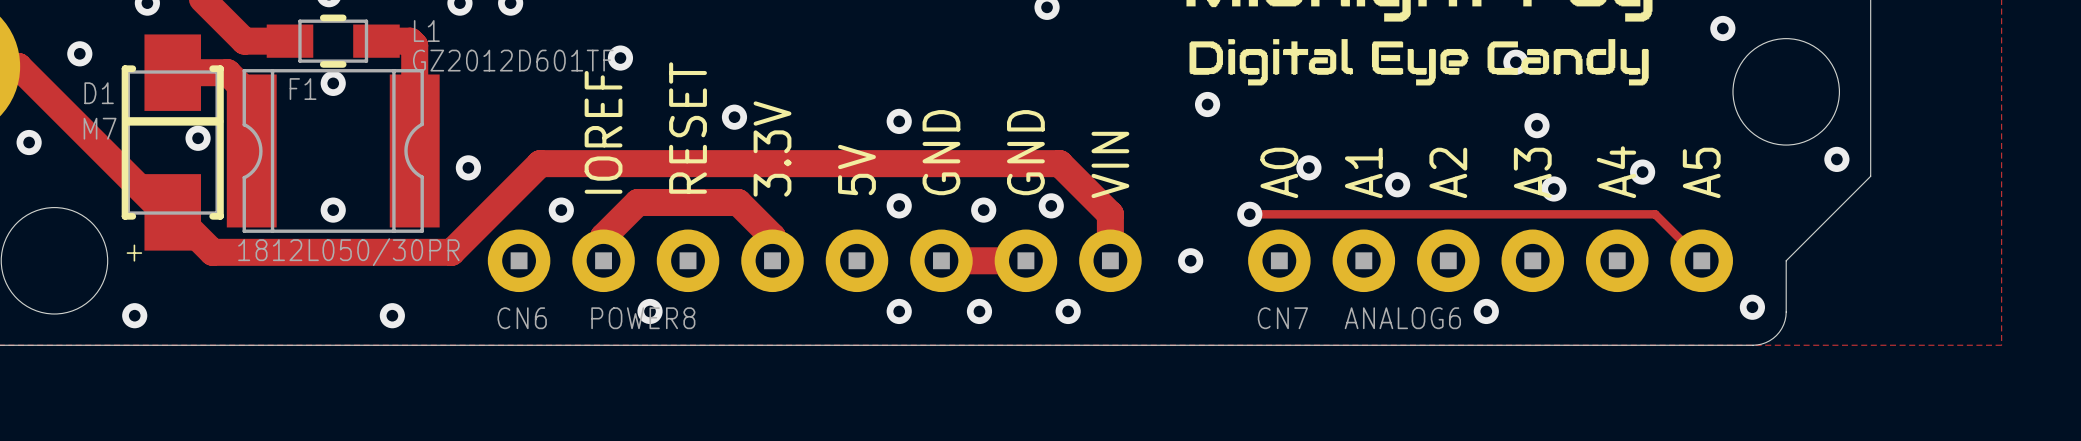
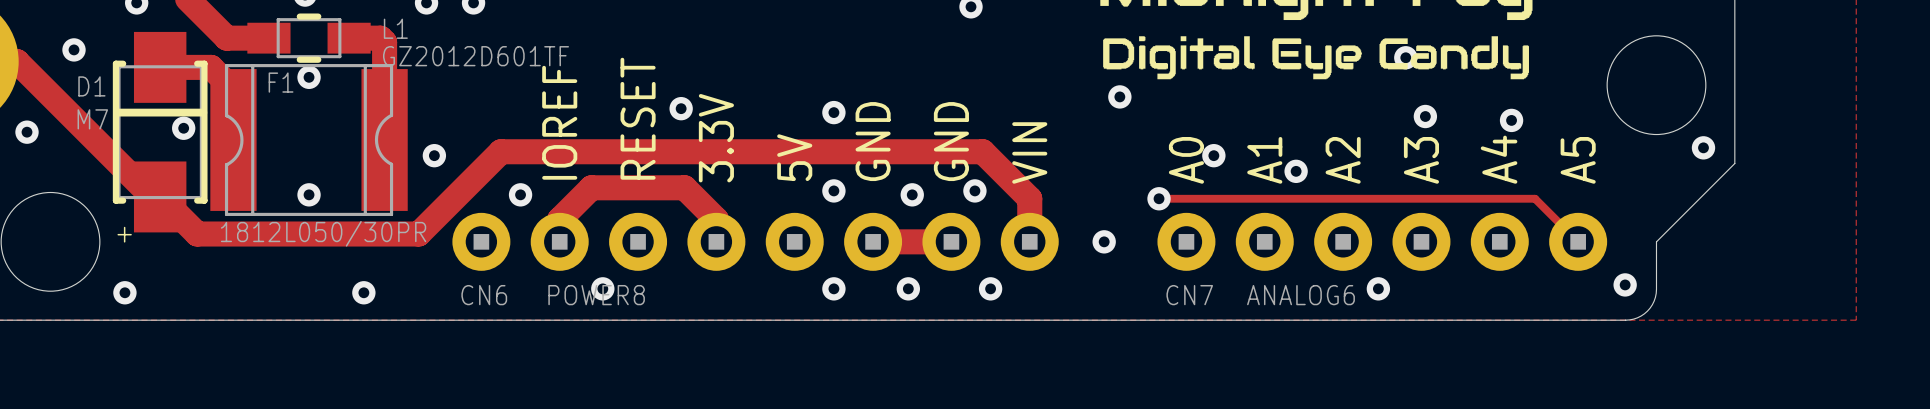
via: (1722, 28) -> none
via: (620, 58) -> none
via position: (1642, 172) -> (1511, 120)
via: (1553, 188) -> none

